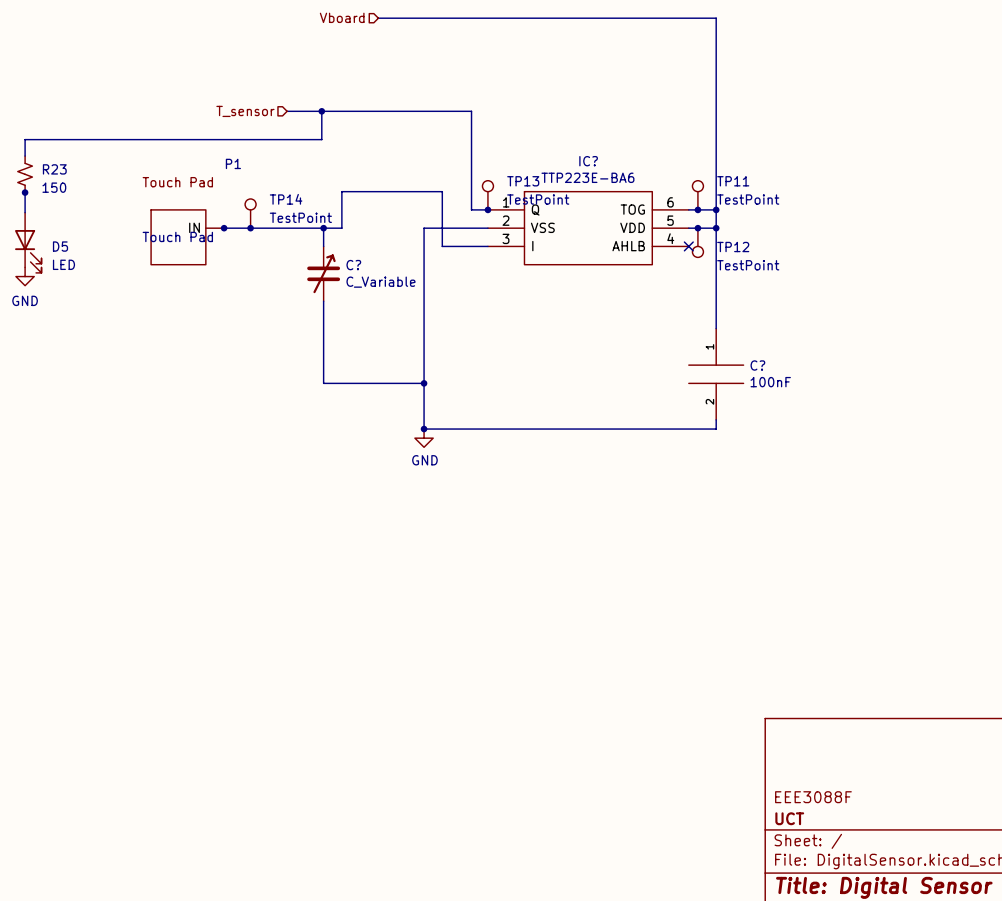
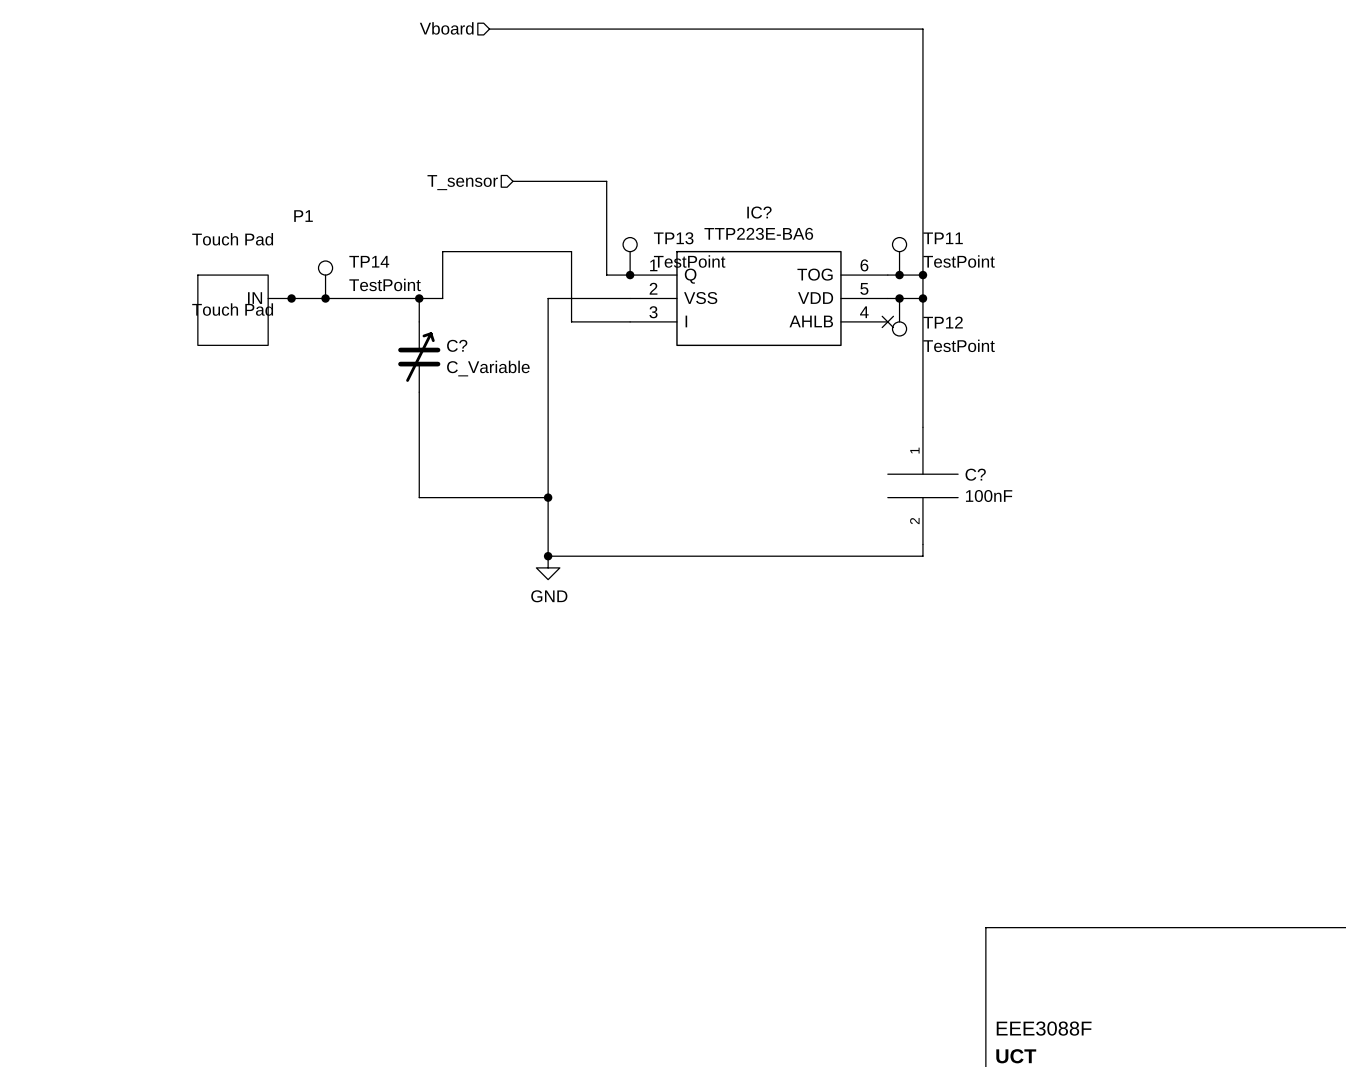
hierarchical label position: T_sensor (245, 111) -> T_sensor (462, 182)
wire: (287, 111) (471, 111) (471, 209) -> (512, 181) (606, 181) (606, 275) (609, 275)
wire: (321, 111) (321, 139) (25, 139) (25, 156) -> none
junction: (321, 111) -> none
R23: 150 (25, 174) -> none
wire: (25, 191) (25, 212) -> none
junction: (25, 192) -> none
D5: LED (28, 242) -> none
power symbol: GND (25, 276) -> none

